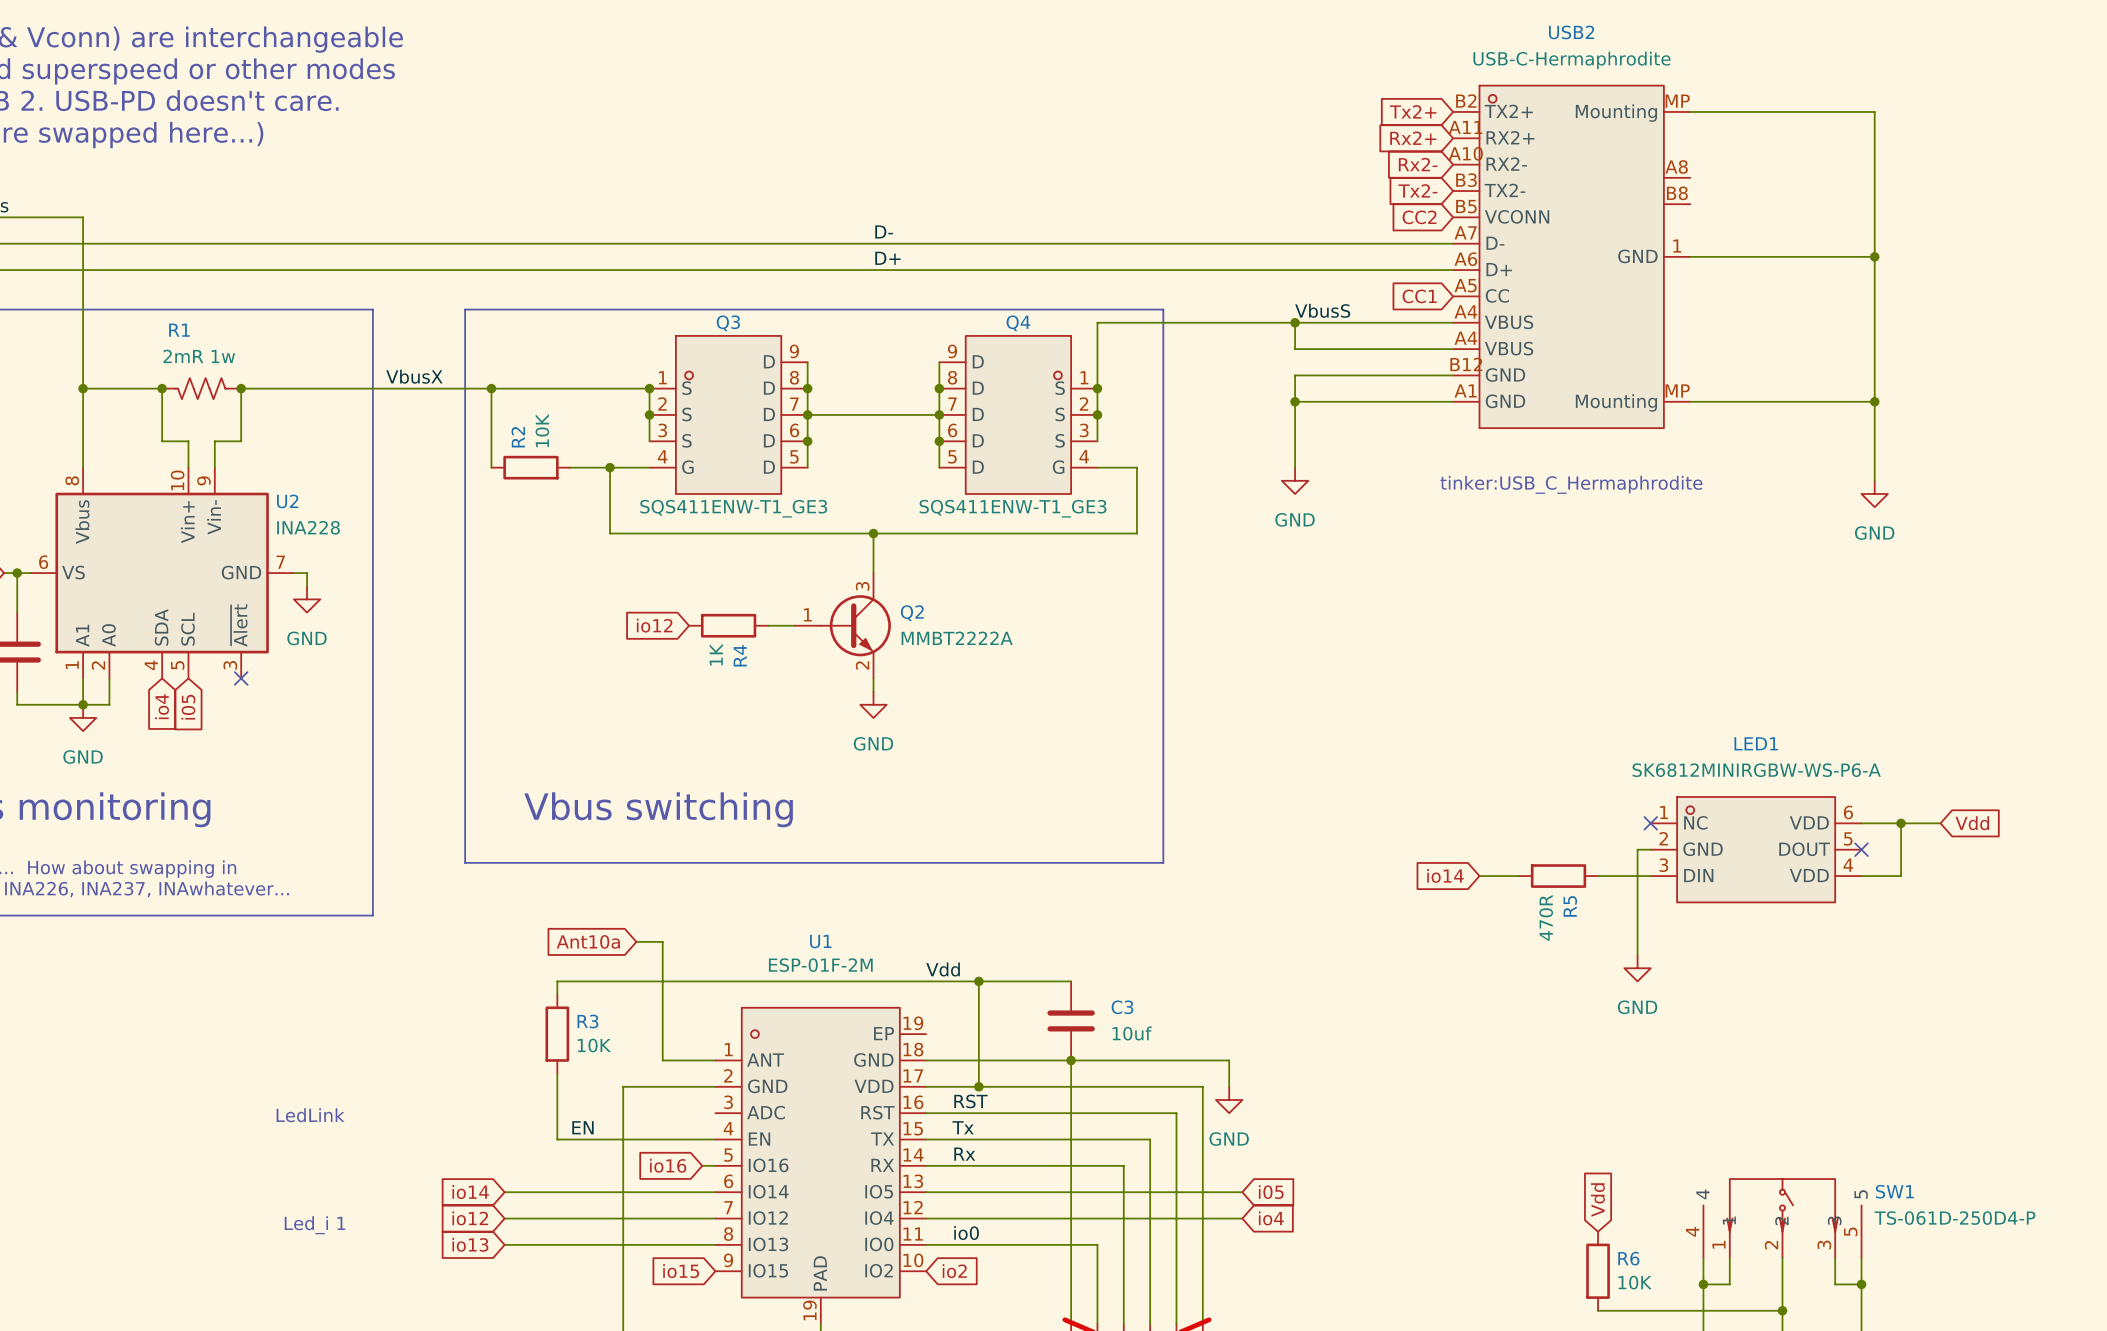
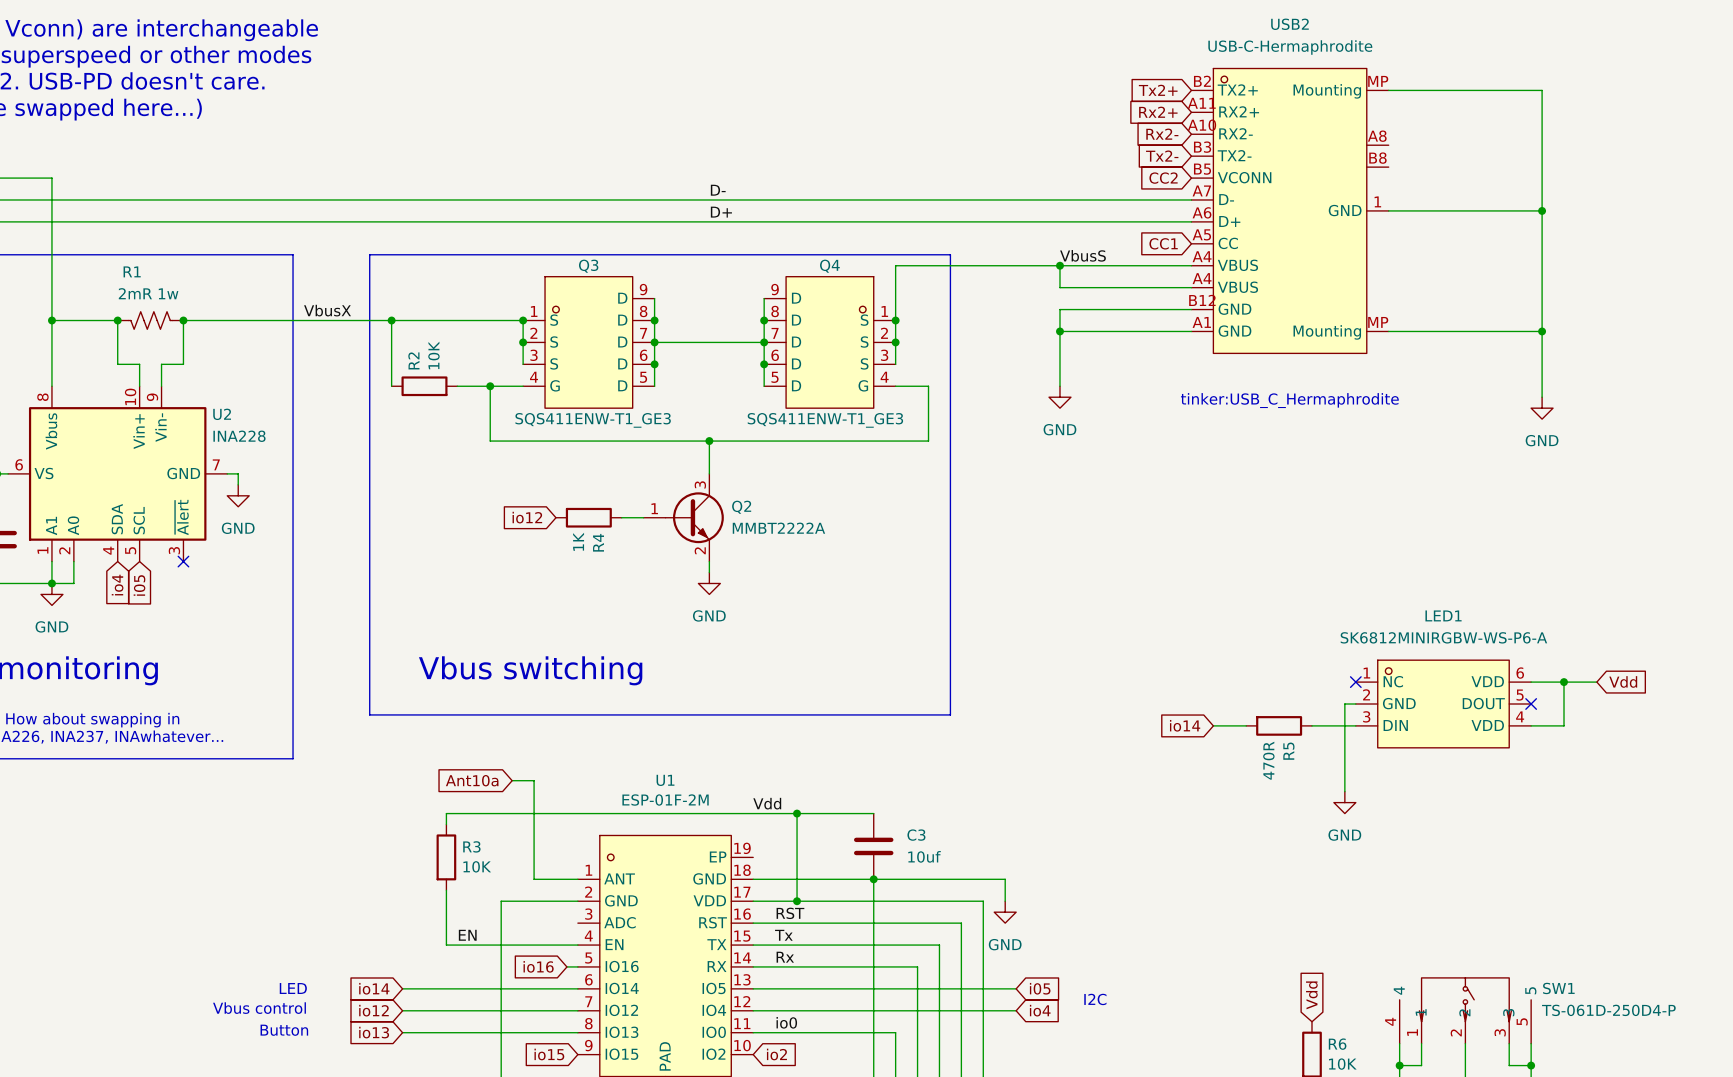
text: LedLink (310, 1115) -> none
text: none -> LED (293, 988)
text: none -> I2C (1095, 999)
text: none -> Vbus control (259, 1008)
text: Led_i 1 (314, 1225) -> none
text: none -> Button (284, 1030)

